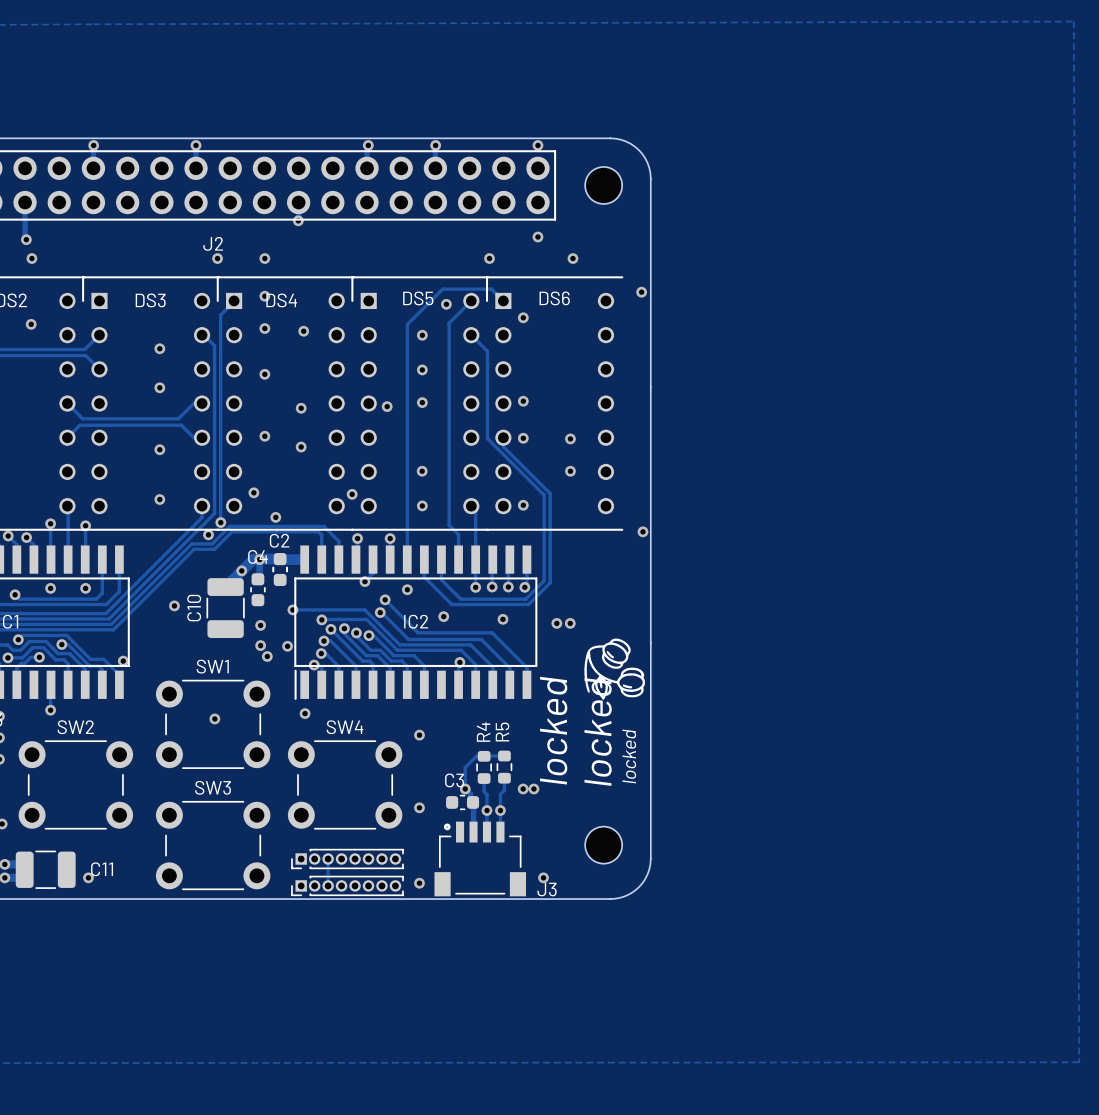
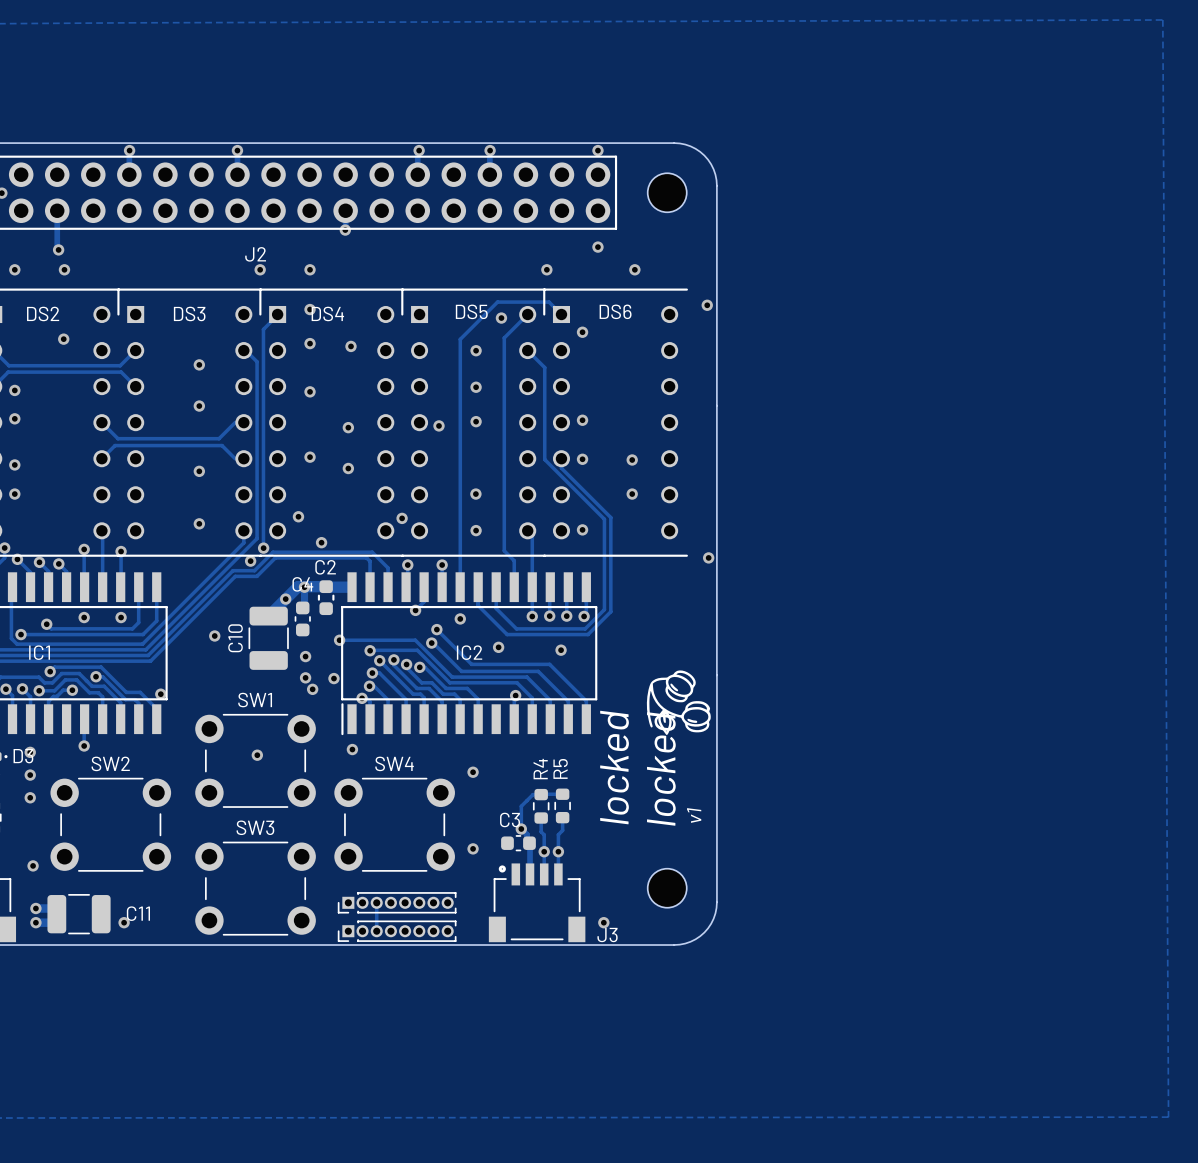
via: (556, 623) -> none
via: (570, 623) -> none
text: locked (629, 756) -> v1 (694, 815)
via: (523, 788) -> none
via: (533, 788) -> none
via: (419, 883) -> none

